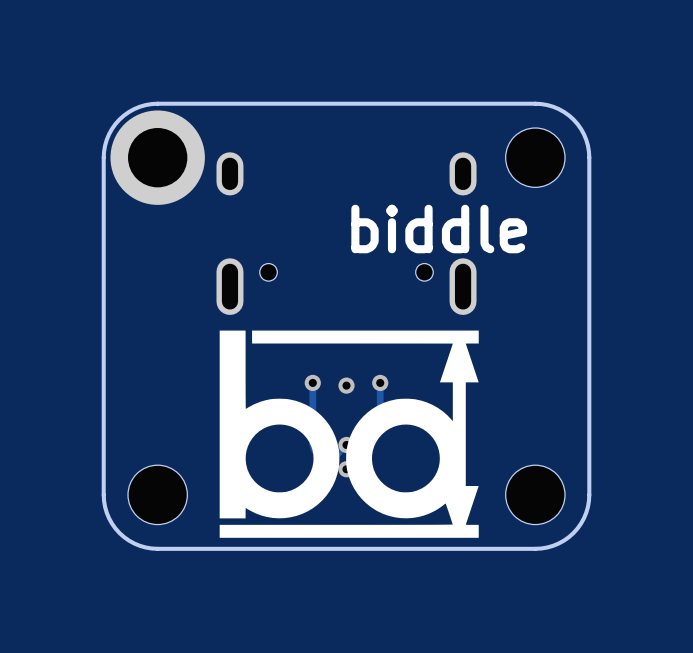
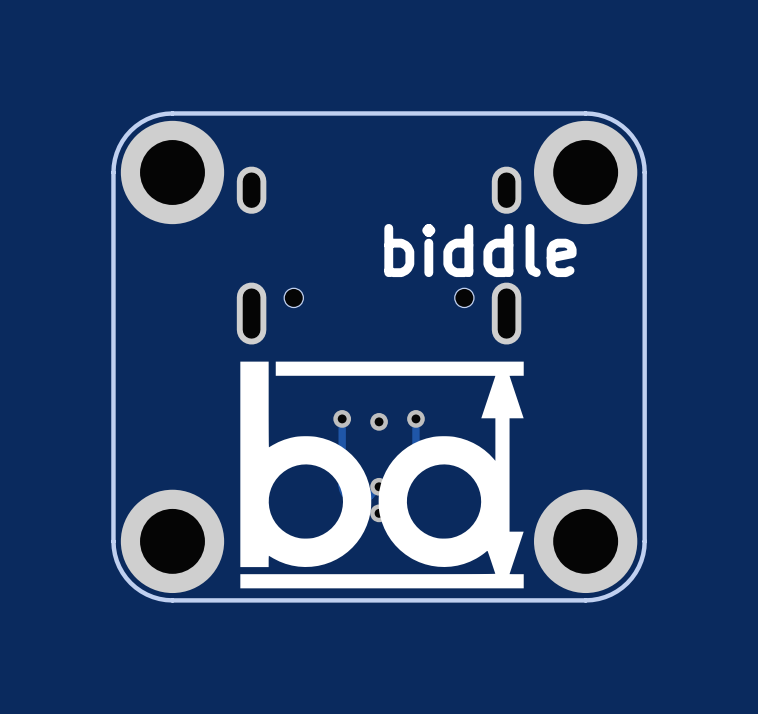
part footprint: [505, 128, 566, 188] -> [534, 120, 638, 225]
part footprint: [128, 465, 188, 525] -> [120, 489, 225, 594]
part footprint: [505, 465, 566, 525] -> [534, 489, 638, 594]

